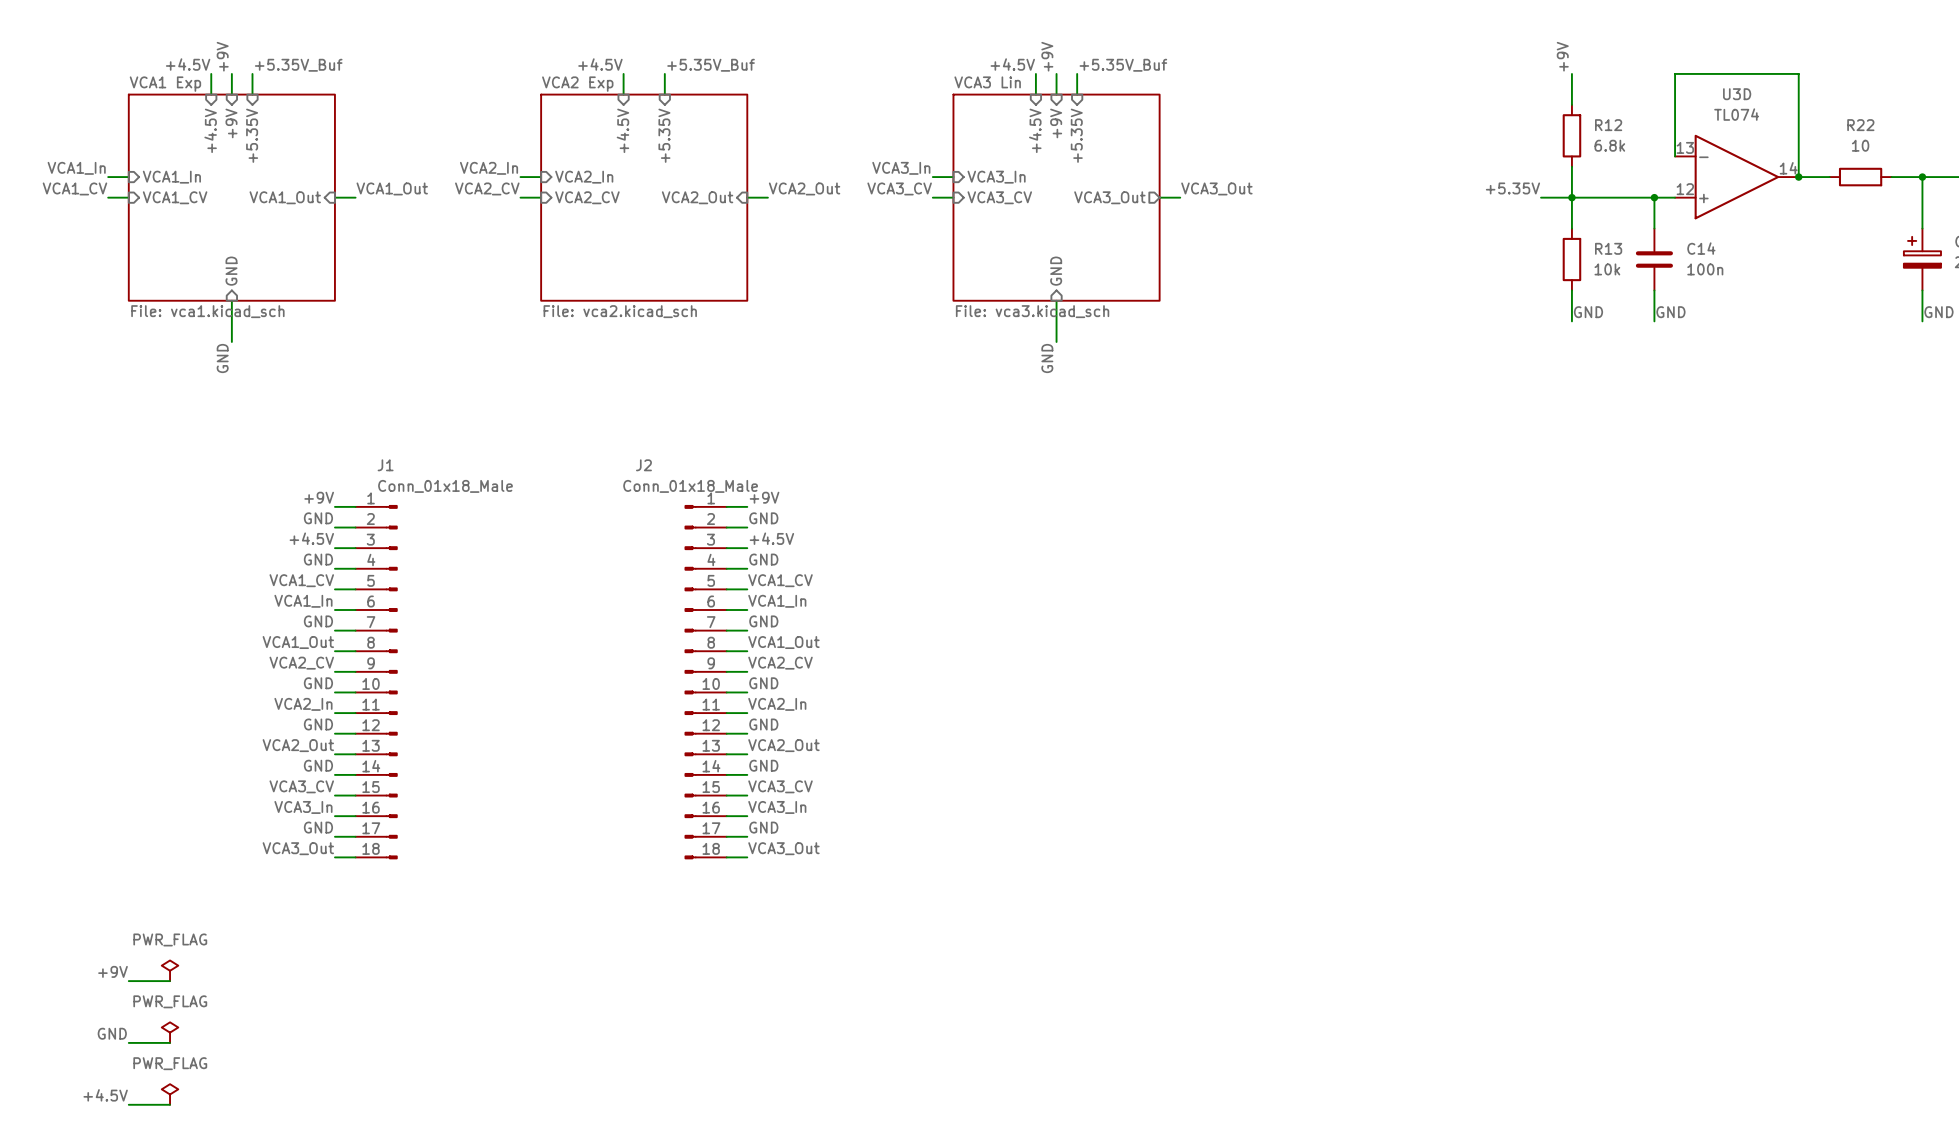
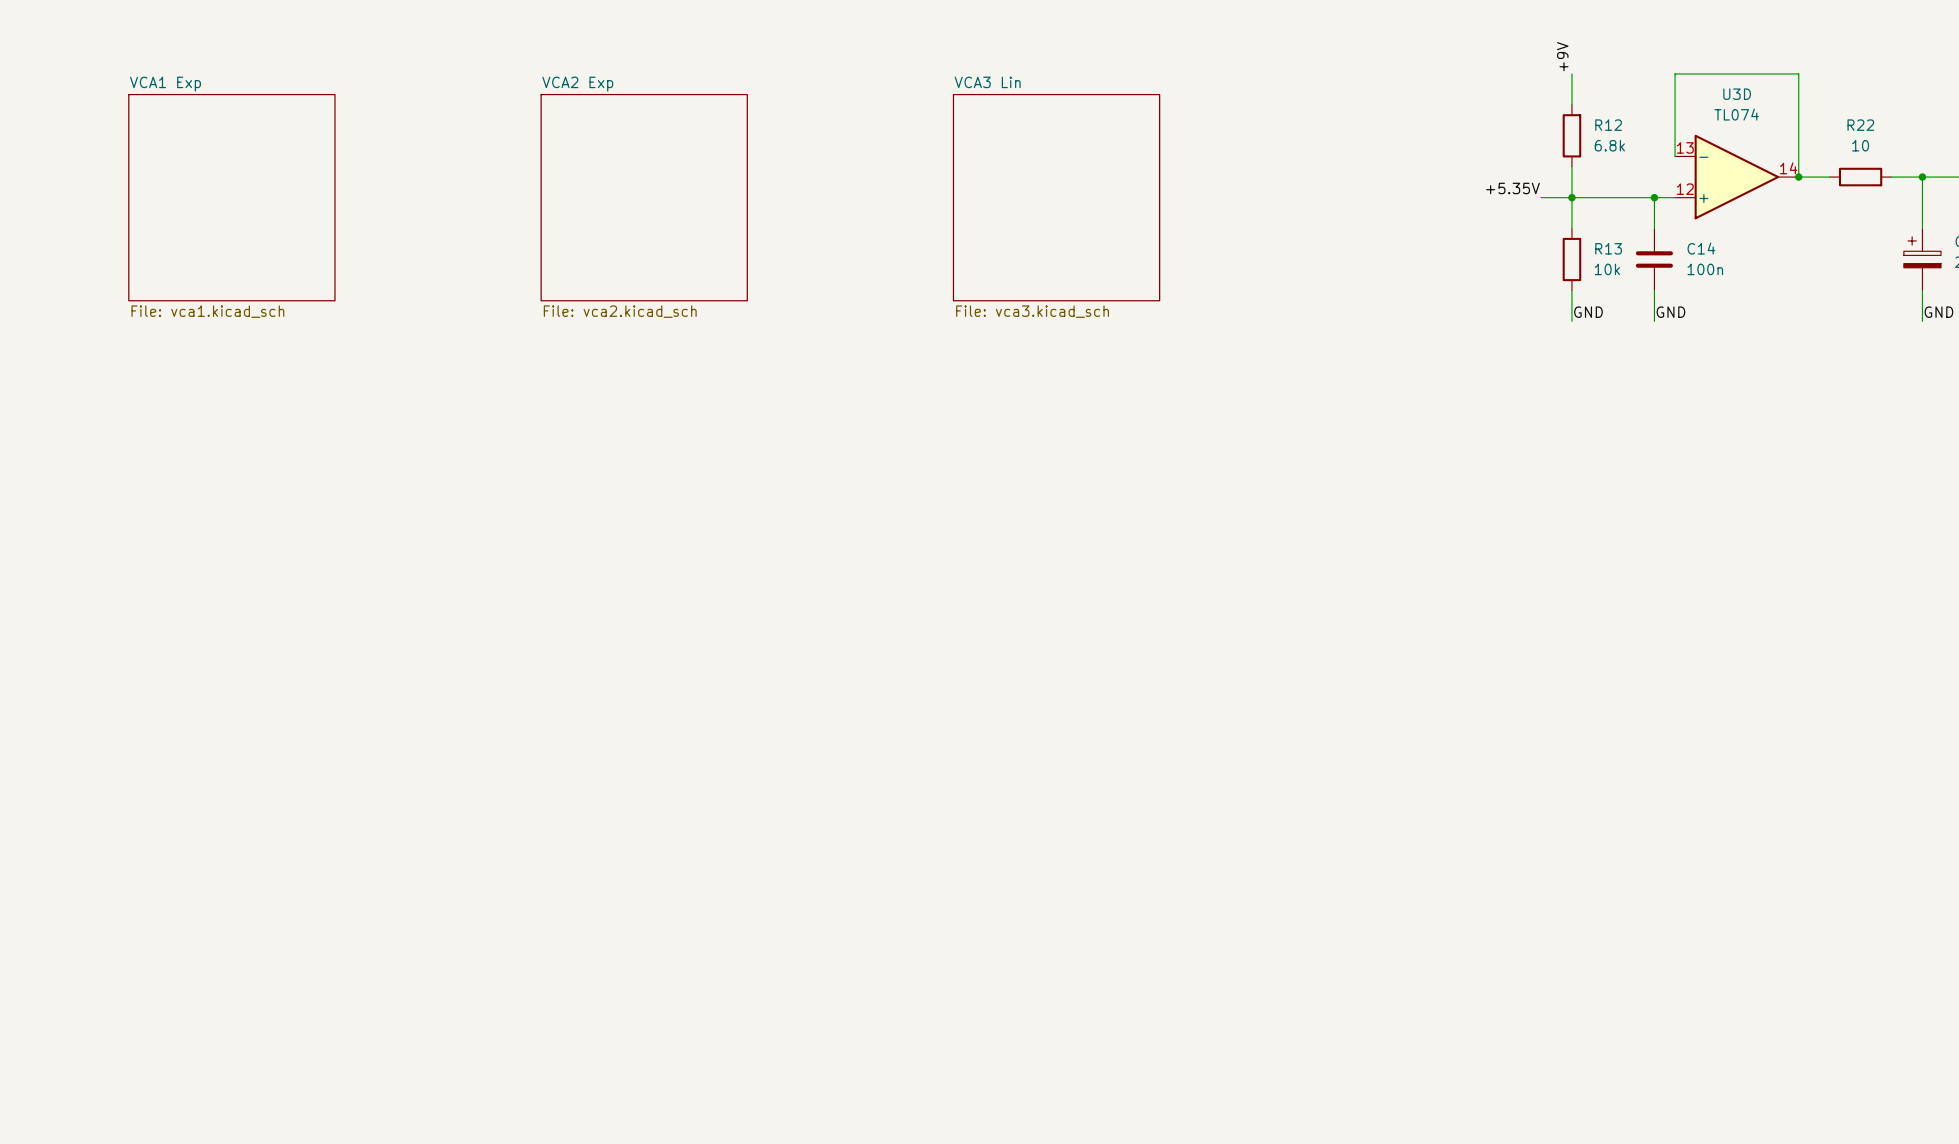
label: +9V (222, 56) -> none
label: +9V (1047, 56) -> none
label: +4.5V (188, 64) -> none
label: +4.5V (600, 64) -> none
label: +4.5V (1012, 64) -> none
label: +5.35V_Buf (298, 65) -> none
label: +5.35V_Buf (711, 65) -> none
label: +5.35V_Buf (1123, 65) -> none
wire: (211, 73) (211, 94) -> none
wire: (231, 73) (231, 94) -> none
wire: (252, 73) (252, 94) -> none
wire: (623, 73) (623, 94) -> none
wire: (664, 73) (664, 94) -> none
wire: (1035, 73) (1035, 94) -> none
wire: (1056, 73) (1056, 94) -> none
wire: (1077, 73) (1077, 94) -> none
sheet pin: +9V (231, 123) -> none
sheet pin: +9V (1056, 123) -> none
sheet pin: +4.5V (210, 130) -> none
sheet pin: +4.5V (622, 130) -> none
sheet pin: +4.5V (1035, 130) -> none
sheet pin: +5.35V (252, 135) -> none
sheet pin: +5.35V (664, 135) -> none
sheet pin: +5.35V (1076, 135) -> none
label: VCA1_In (76, 168) -> none
label: VCA2_In (489, 168) -> none
label: VCA3_In (901, 168) -> none
wire: (108, 177) (128, 177) -> none
sheet pin: VCA1_In (171, 177) -> none
wire: (520, 177) (541, 177) -> none
sheet pin: VCA2_In (584, 177) -> none
wire: (932, 177) (953, 177) -> none
sheet pin: VCA3_In (996, 177) -> none
label: VCA1_CV (74, 188) -> none
label: VCA1_Out (392, 188) -> none
label: VCA2_CV (487, 188) -> none
label: VCA2_Out (804, 188) -> none
label: VCA3_CV (899, 188) -> none
label: VCA3_Out (1216, 188) -> none
wire: (108, 197) (128, 197) -> none
sheet pin: VCA1_CV (175, 197) -> none
sheet pin: VCA1_Out (285, 197) -> none
wire: (334, 197) (355, 197) -> none
wire: (520, 197) (541, 197) -> none
sheet pin: VCA2_CV (587, 197) -> none
sheet pin: VCA2_Out (697, 197) -> none
wire: (747, 197) (767, 197) -> none
wire: (932, 197) (953, 197) -> none
sheet pin: VCA3_CV (999, 197) -> none
sheet pin: VCA3_Out (1109, 197) -> none
wire: (1159, 197) (1180, 197) -> none
sheet pin: GND (231, 271) -> none
sheet pin: GND (1056, 271) -> none
wire: (231, 300) (231, 341) -> none
wire: (1056, 300) (1056, 341) -> none
label: GND (222, 358) -> none
label: GND (1047, 358) -> none
label: +9V (319, 497) -> none
label: +9V (764, 497) -> none
wire: (334, 506) (355, 506) -> none
wire: (726, 506) (747, 506) -> none
label: GND (318, 518) -> none
label: GND (763, 518) -> none
wire: (334, 527) (355, 527) -> none
wire: (726, 527) (747, 527) -> none
label: +4.5V (311, 538) -> none
label: +4.5V (771, 538) -> none
wire: (334, 548) (355, 548) -> none
wire: (726, 548) (747, 548) -> none
label: GND (318, 559) -> none
label: GND (763, 559) -> none
wire: (334, 568) (355, 568) -> none
wire: (726, 568) (747, 568) -> none
label: VCA1_CV (301, 580) -> none
label: VCA1_CV (780, 580) -> none
wire: (334, 589) (355, 589) -> none
wire: (726, 589) (747, 589) -> none
label: VCA1_In (303, 601) -> none
label: VCA1_In (777, 601) -> none
wire: (334, 610) (355, 610) -> none
wire: (726, 610) (747, 610) -> none
label: GND (318, 621) -> none
label: GND (763, 621) -> none
wire: (334, 630) (355, 630) -> none
wire: (726, 630) (747, 630) -> none
label: VCA1_Out (298, 642) -> none
label: VCA1_Out (783, 642) -> none
wire: (334, 651) (355, 651) -> none
wire: (726, 651) (747, 651) -> none
label: VCA2_CV (301, 663) -> none
label: VCA2_CV (780, 663) -> none
wire: (334, 671) (355, 671) -> none
wire: (726, 671) (747, 671) -> none
J1: Conn_01x18_Male (376, 682) -> none
J2: Conn_01x18_Male (705, 682) -> none
label: GND (318, 683) -> none
label: GND (763, 683) -> none
wire: (334, 692) (355, 692) -> none
wire: (726, 692) (747, 692) -> none
label: VCA2_In (303, 704) -> none
label: VCA2_In (777, 704) -> none
wire: (334, 713) (355, 713) -> none
wire: (726, 713) (747, 713) -> none
label: GND (318, 724) -> none
label: GND (763, 724) -> none
wire: (334, 733) (355, 733) -> none
wire: (726, 733) (747, 733) -> none
label: VCA2_Out (298, 745) -> none
label: VCA2_Out (783, 745) -> none
wire: (334, 754) (355, 754) -> none
wire: (726, 754) (747, 754) -> none
label: GND (318, 765) -> none
label: GND (763, 765) -> none
wire: (334, 774) (355, 774) -> none
wire: (726, 774) (747, 774) -> none
label: VCA3_CV (301, 786) -> none
label: VCA3_CV (780, 786) -> none
wire: (334, 795) (355, 795) -> none
wire: (726, 795) (747, 795) -> none
label: VCA3_In (303, 807) -> none
label: VCA3_In (777, 807) -> none
wire: (334, 816) (355, 816) -> none
wire: (726, 816) (747, 816) -> none
label: GND (318, 827) -> none
label: GND (763, 827) -> none
wire: (334, 836) (355, 836) -> none
wire: (726, 836) (747, 836) -> none
label: VCA3_Out (298, 848) -> none
label: VCA3_Out (783, 848) -> none
wire: (334, 857) (355, 857) -> none
wire: (726, 857) (747, 857) -> none
power symbol: PWR_FLAG (170, 970) -> none
label: +9V (113, 971) -> none
wire: (128, 981) (170, 981) -> none
power symbol: PWR_FLAG (170, 1032) -> none
label: GND (112, 1033) -> none
wire: (128, 1042) (170, 1042) -> none
power symbol: PWR_FLAG (170, 1094) -> none
label: +4.5V (105, 1095) -> none
wire: (128, 1104) (170, 1104) -> none

